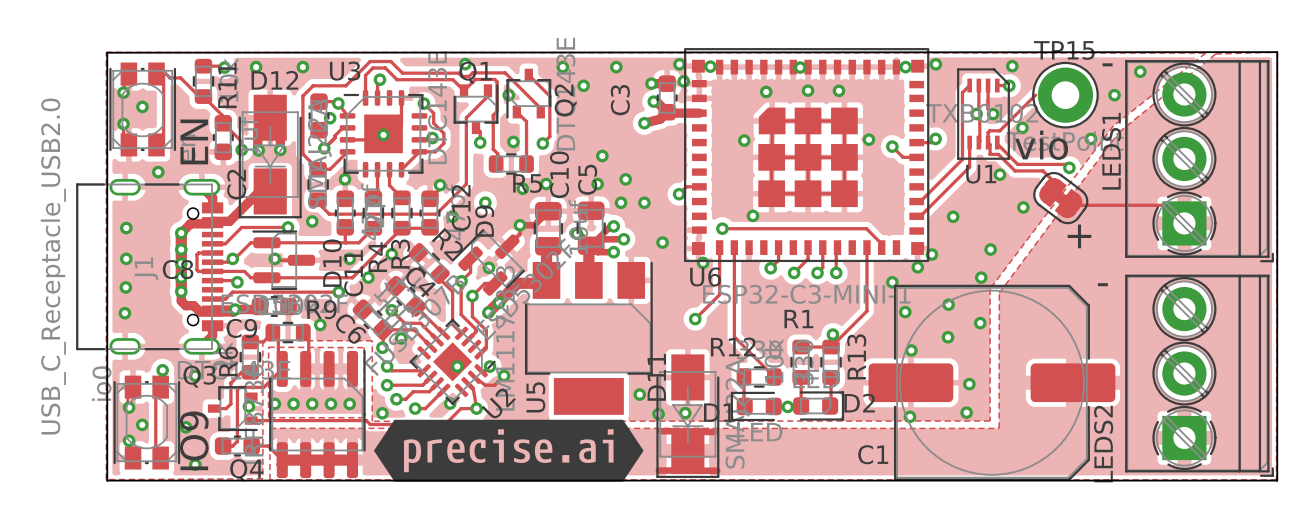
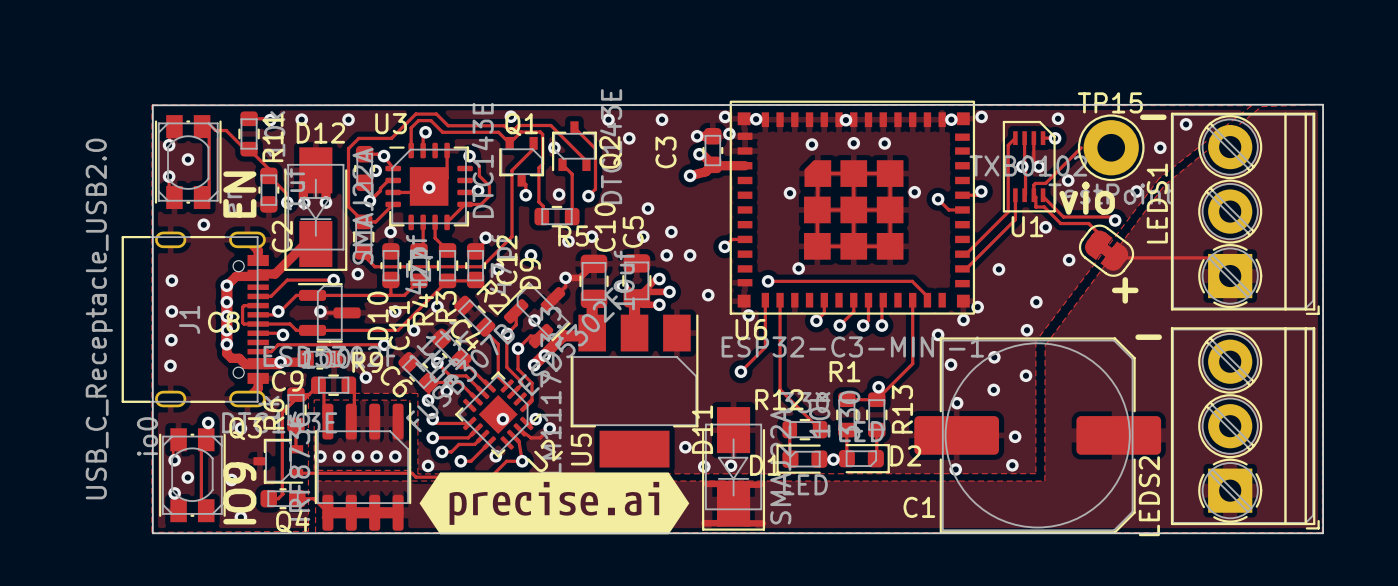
track: (282, 368) (263, 387) (239, 387) (237, 389) (237, 441) -> (309, 394) (304, 399) (295, 399) (282, 412) (283, 494)
track: (250, 372) (241, 372) (230, 383) (230, 403) (226, 408) (214, 408) -> none
track: none -> (295, 429) (295, 448)
via: (248, 406) -> none

